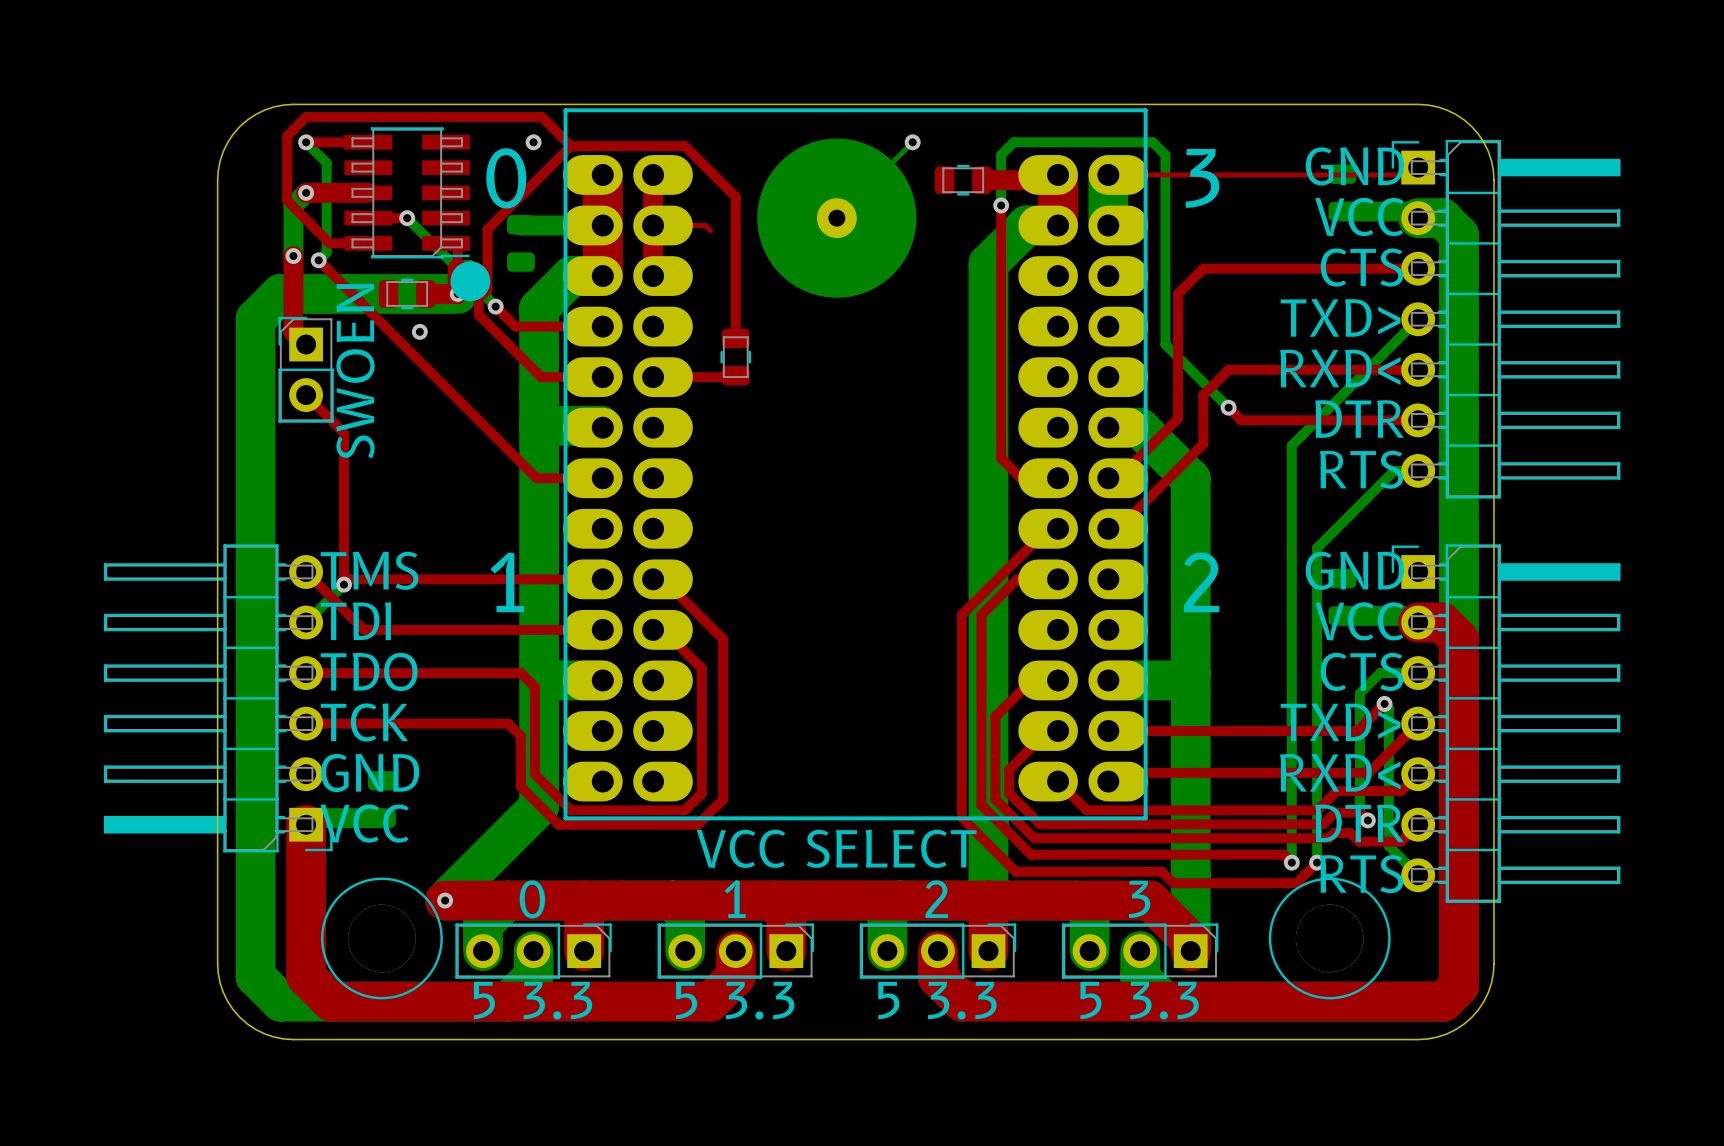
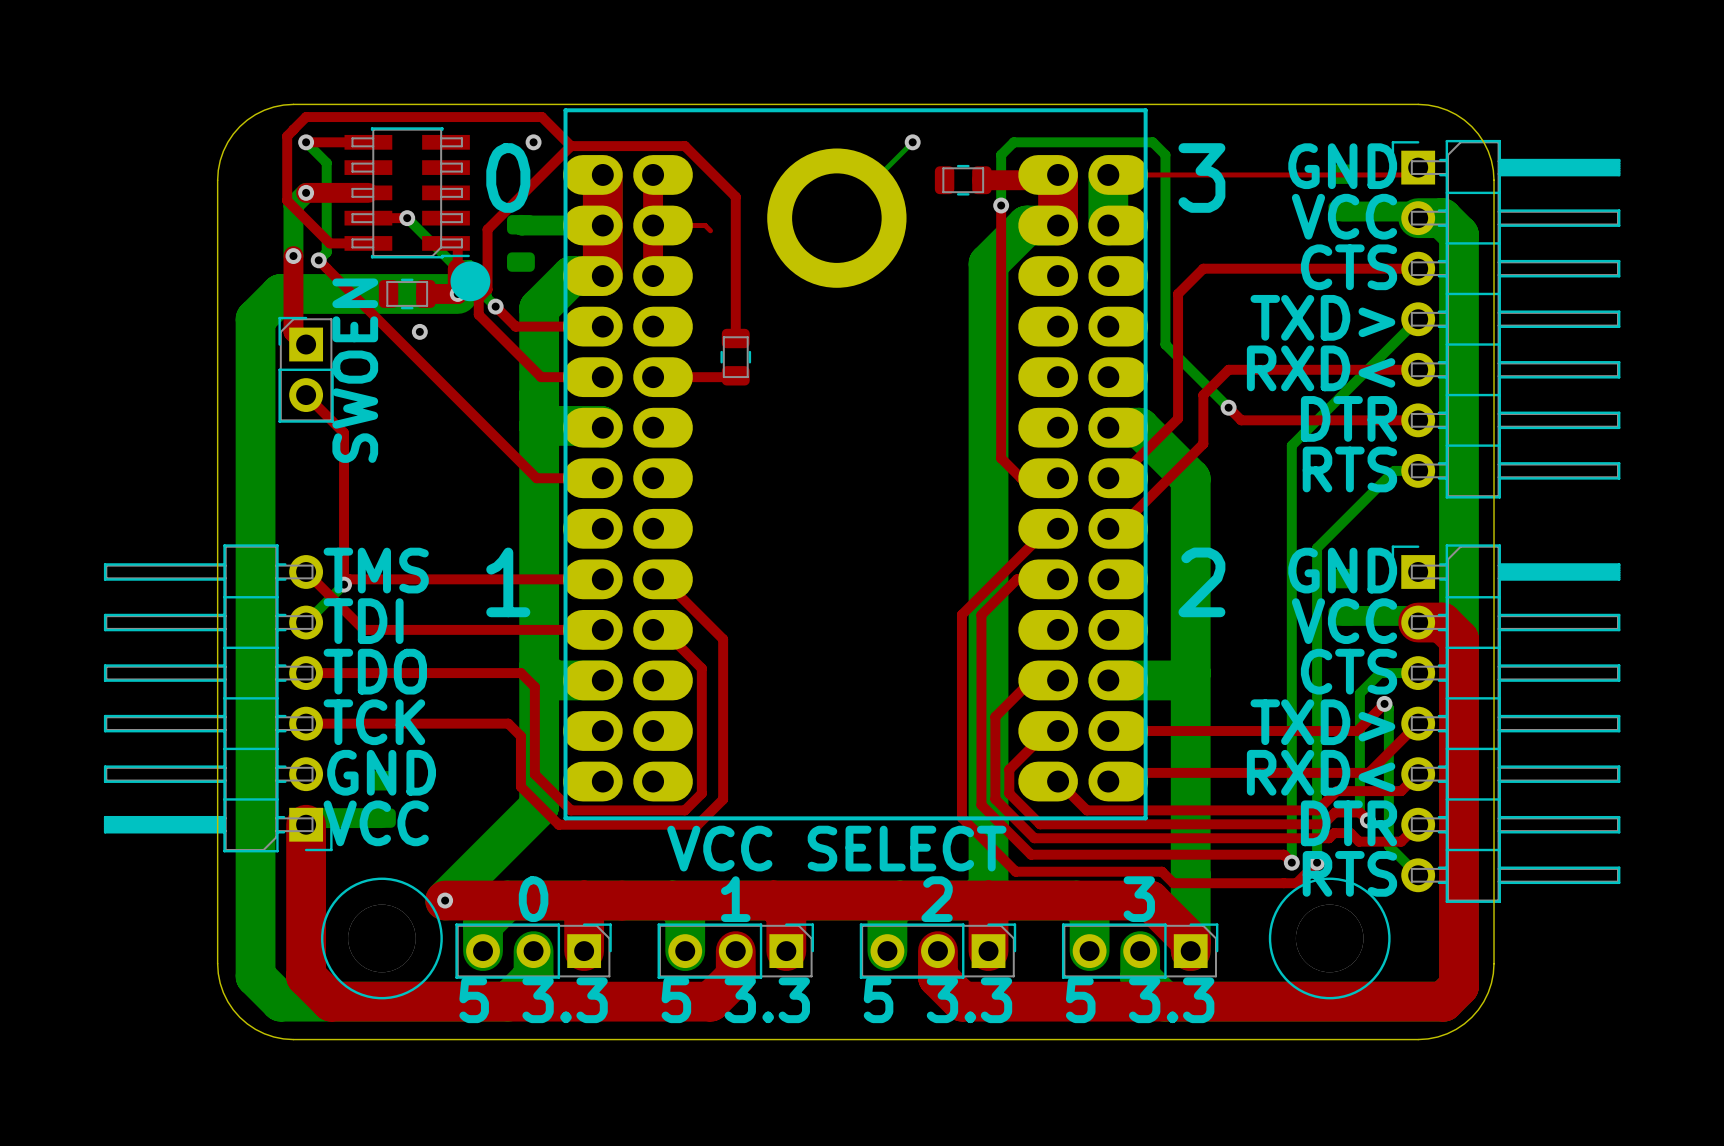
part footprint: [757, 138, 917, 298] -> [767, 148, 907, 288]

